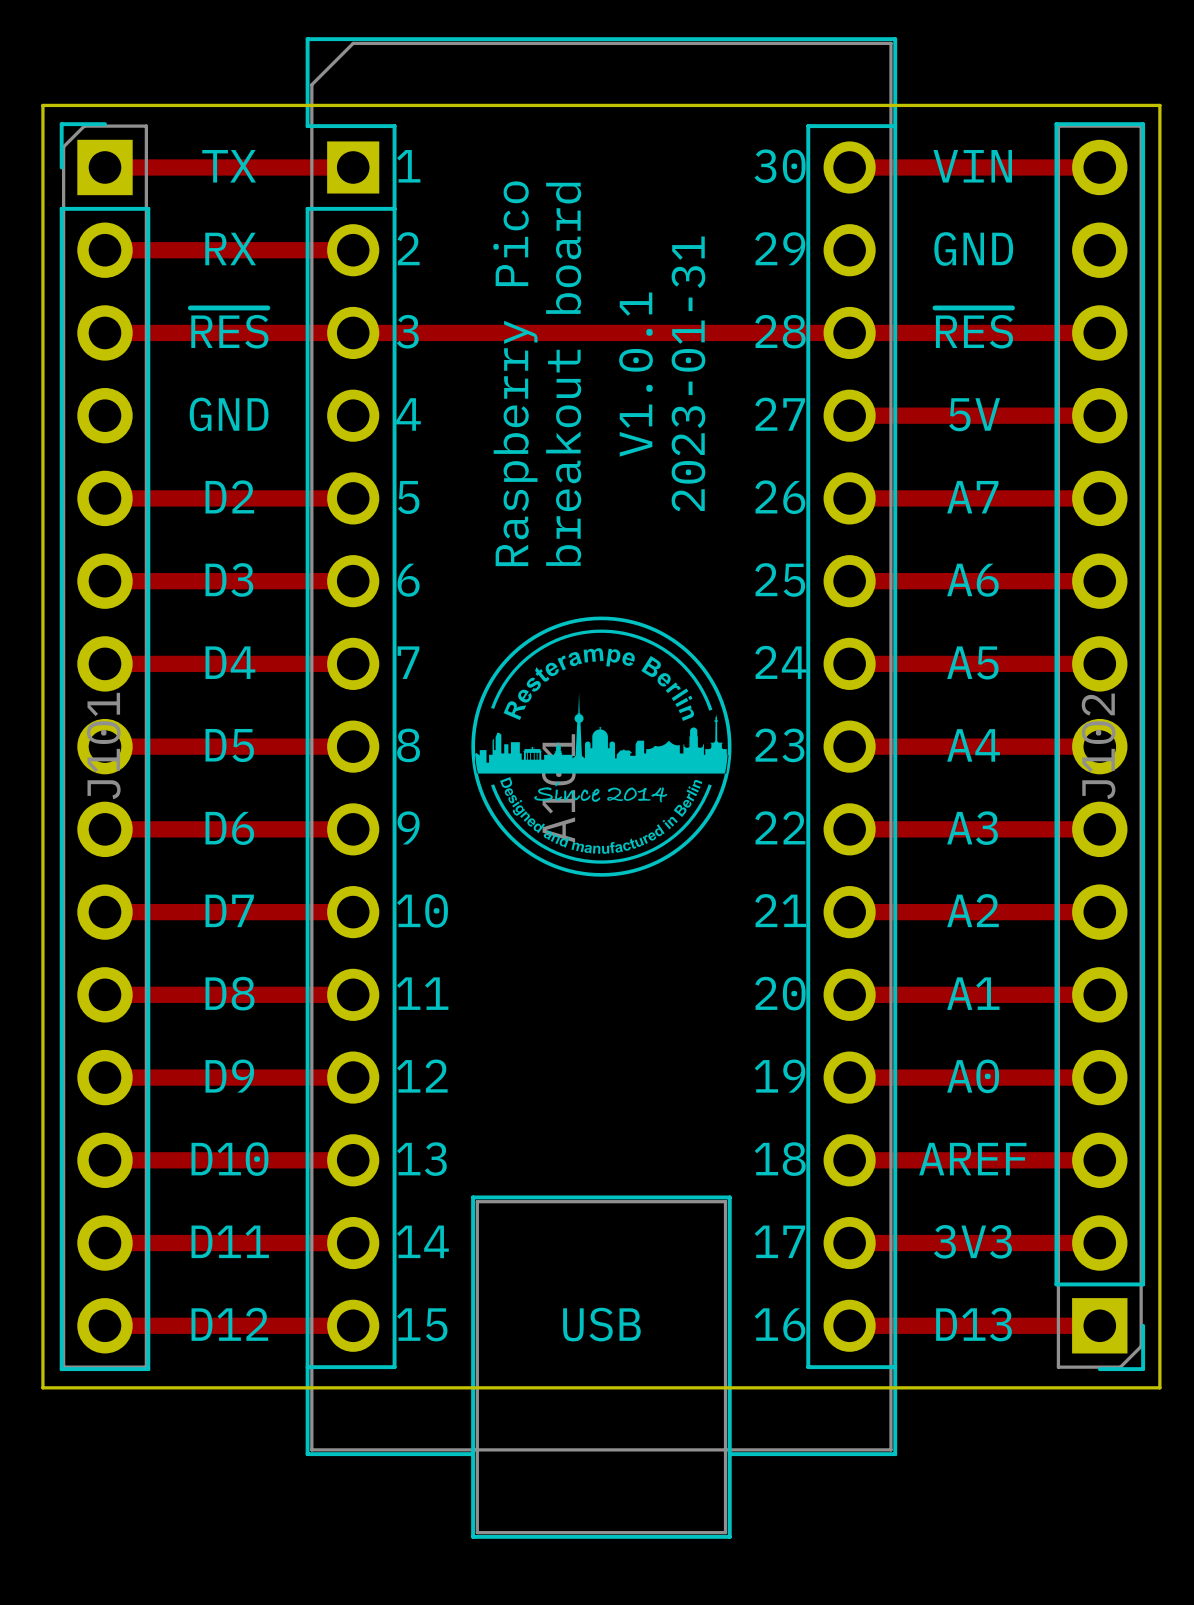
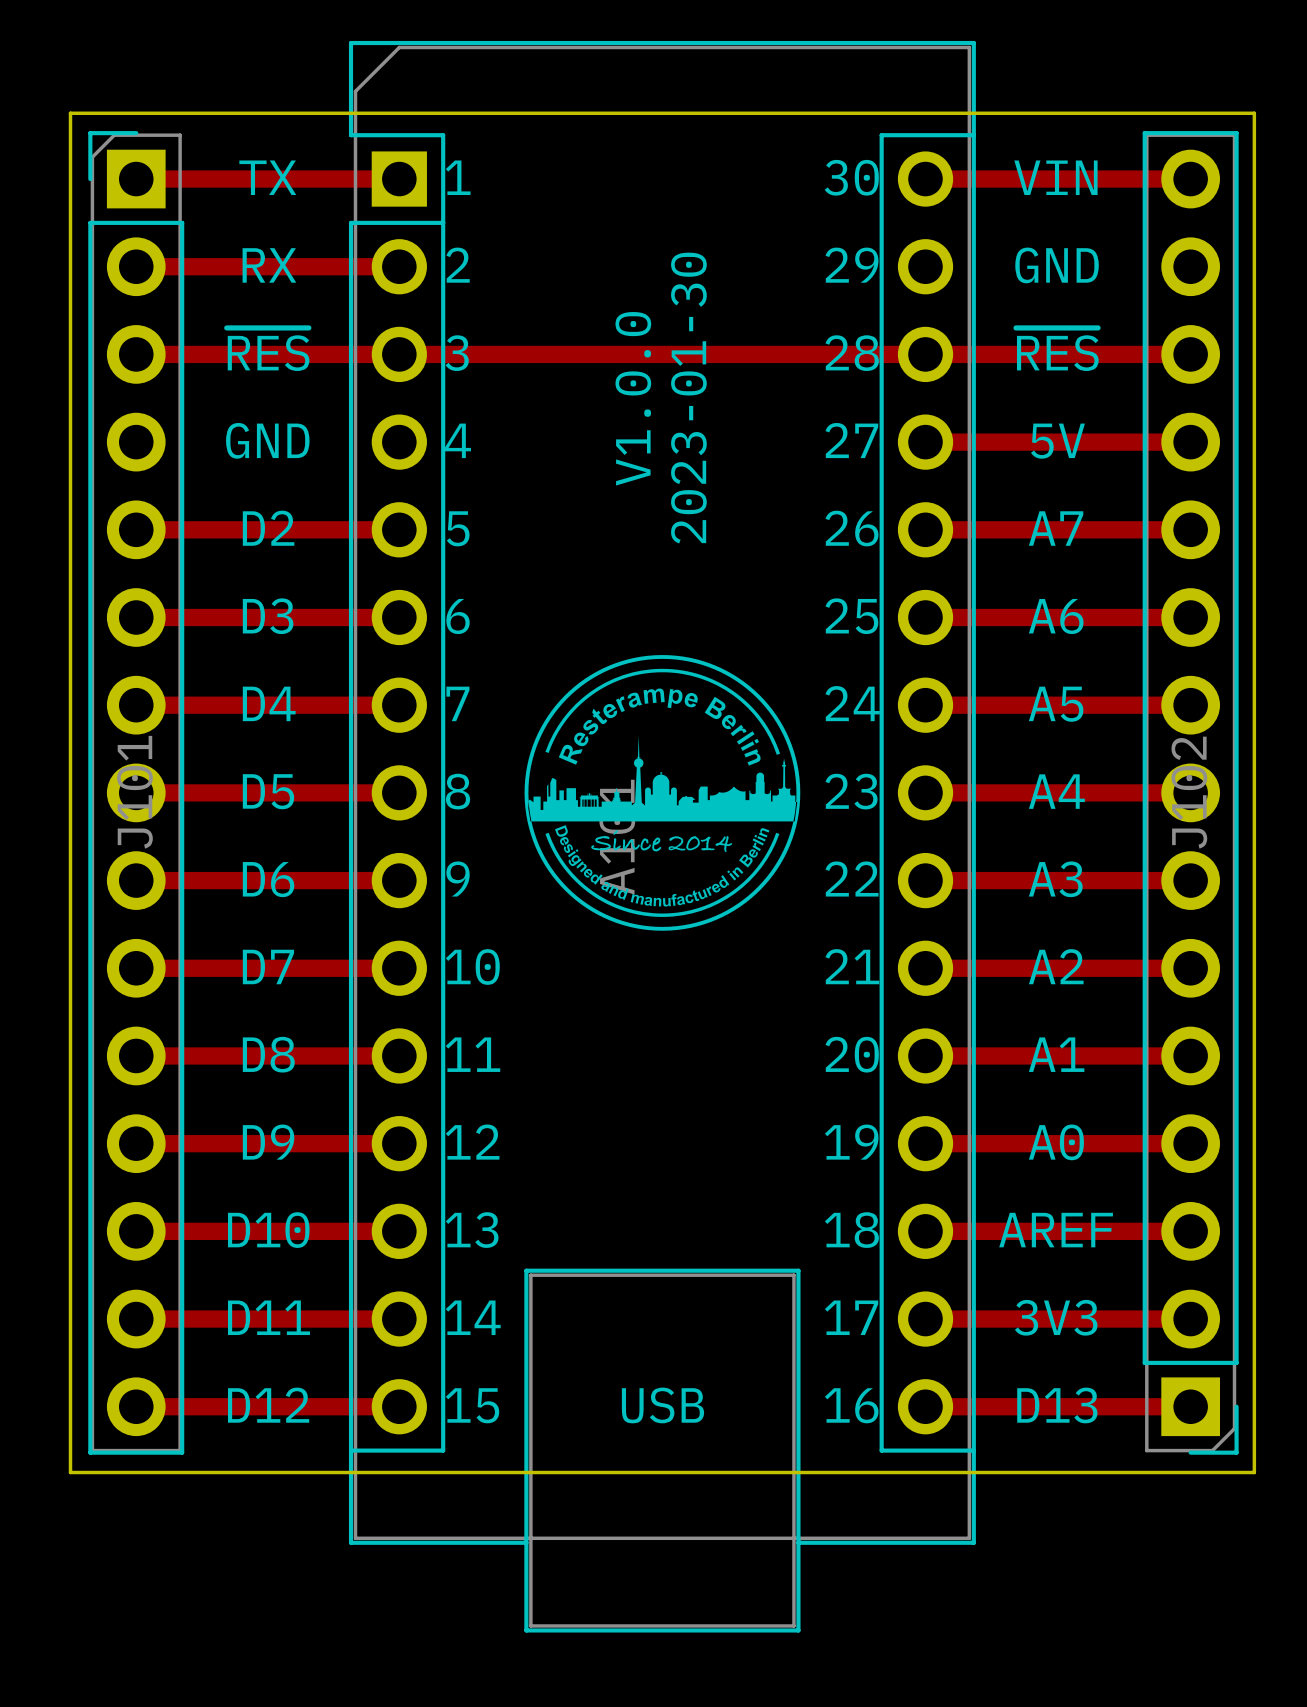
text: Raspberry Pico (515, 373) -> none
text: 2023-01-31 (688, 373) -> none
text: breakout board (563, 374) -> V1.0.0 (633, 398)
text: V1.0.1 (636, 374) -> 2023-01-30 (688, 398)

